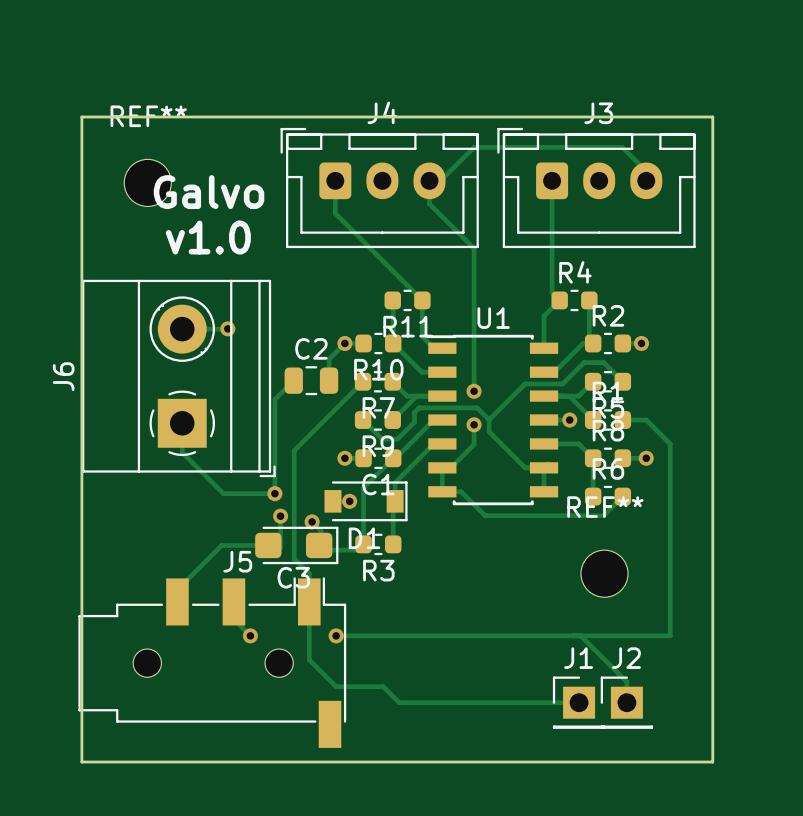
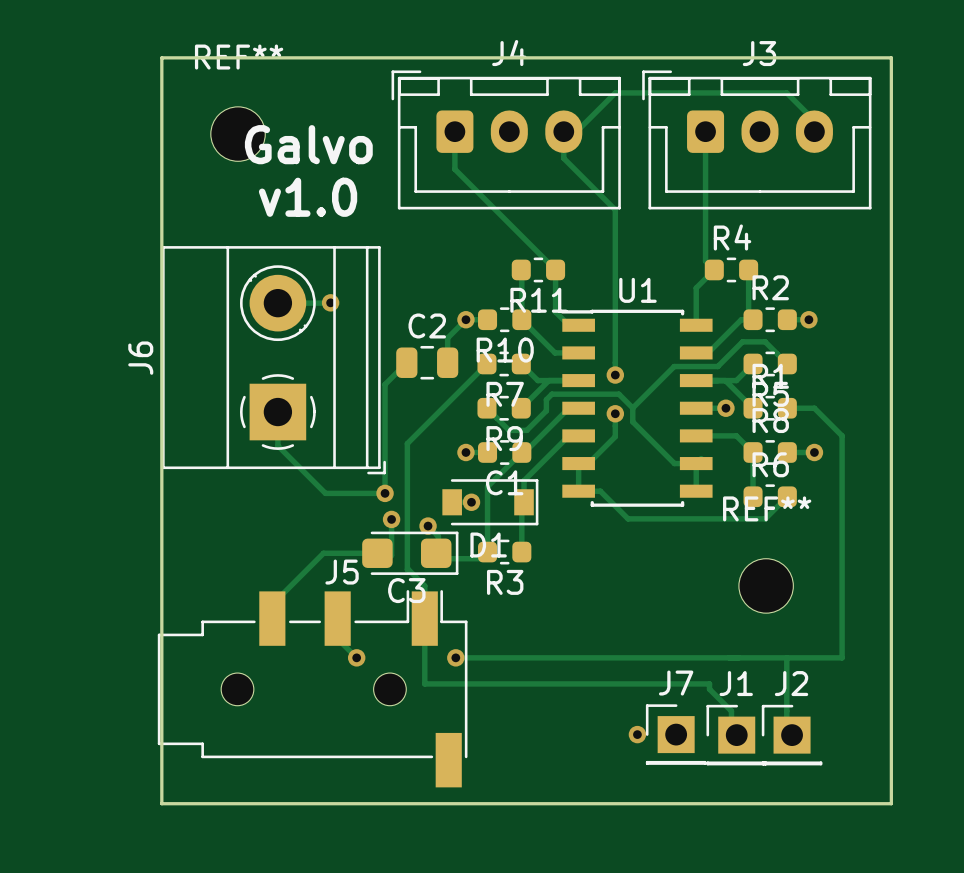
track: (580, 635) (626, 681) (626, 702) -> none
track: none -> (786, 657) (786, 735)
track: (309, 658) (336, 686) (383, 686) (399, 702) (579, 702) -> (424, 683) (709, 683) (709, 689) (731, 711) (731, 735)
via: none -> (637, 734)
J7: none -> (676, 734)

